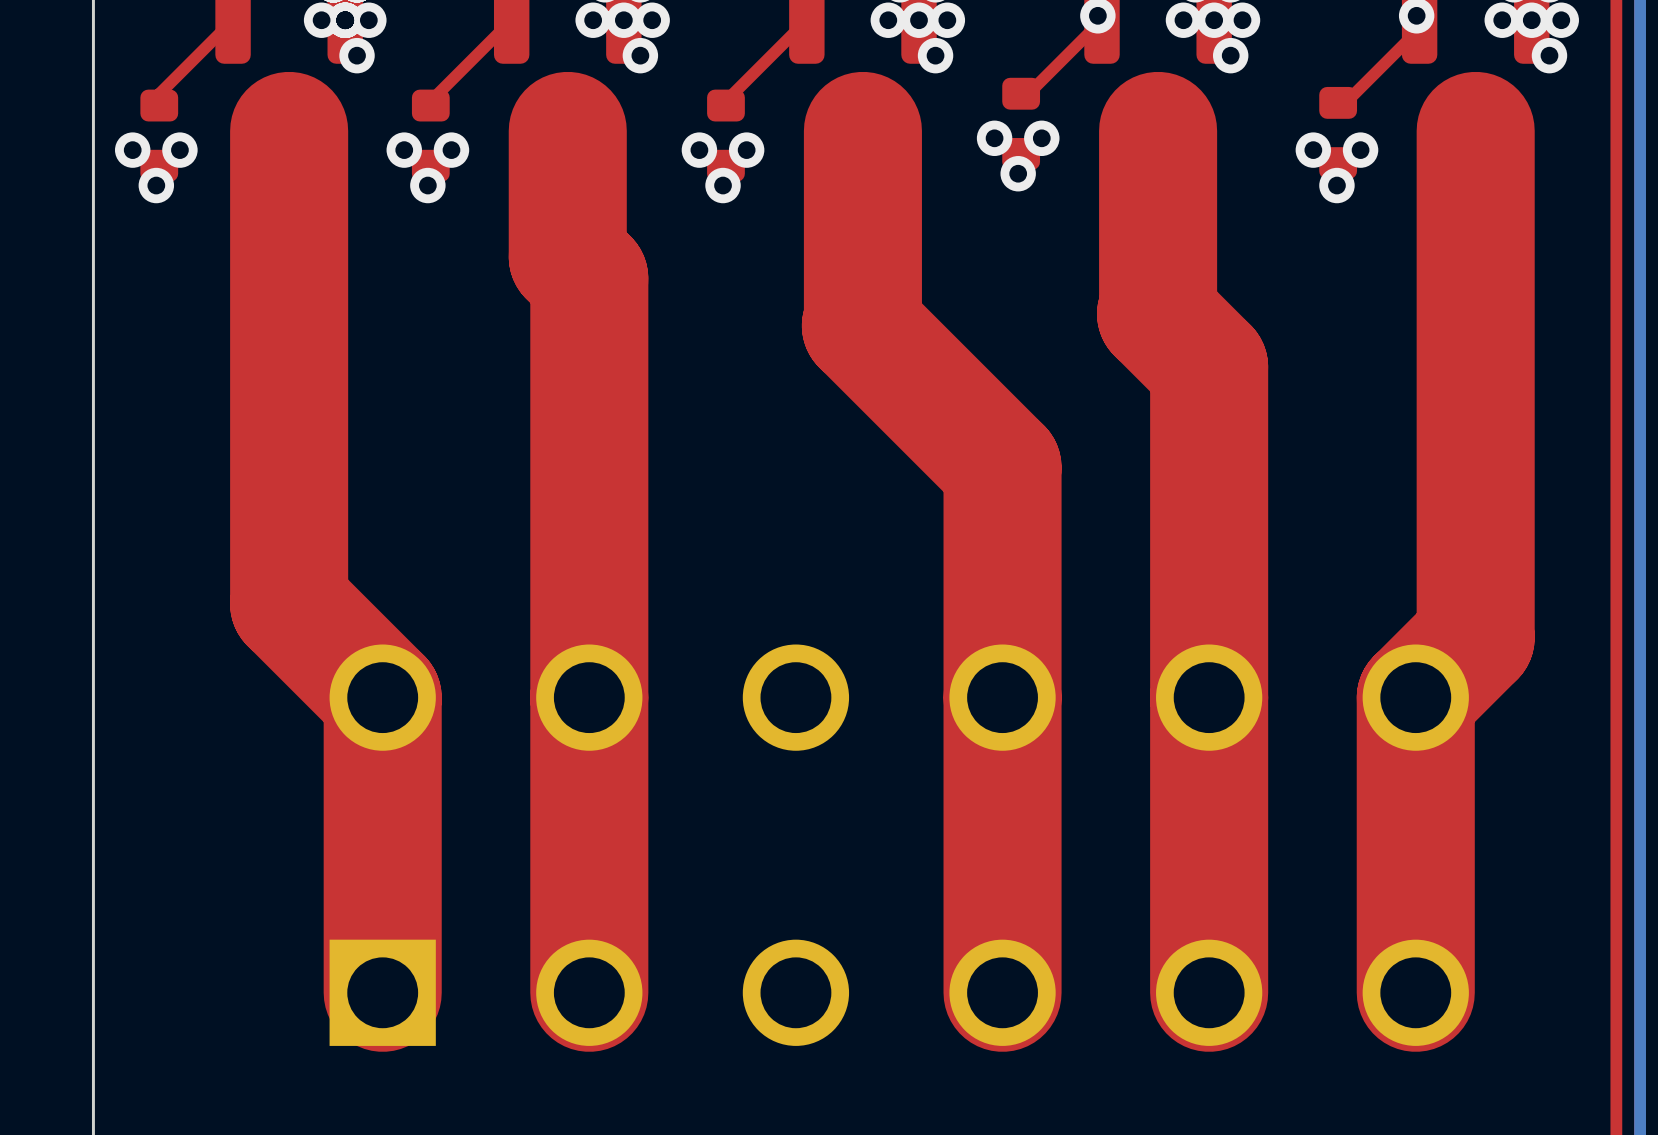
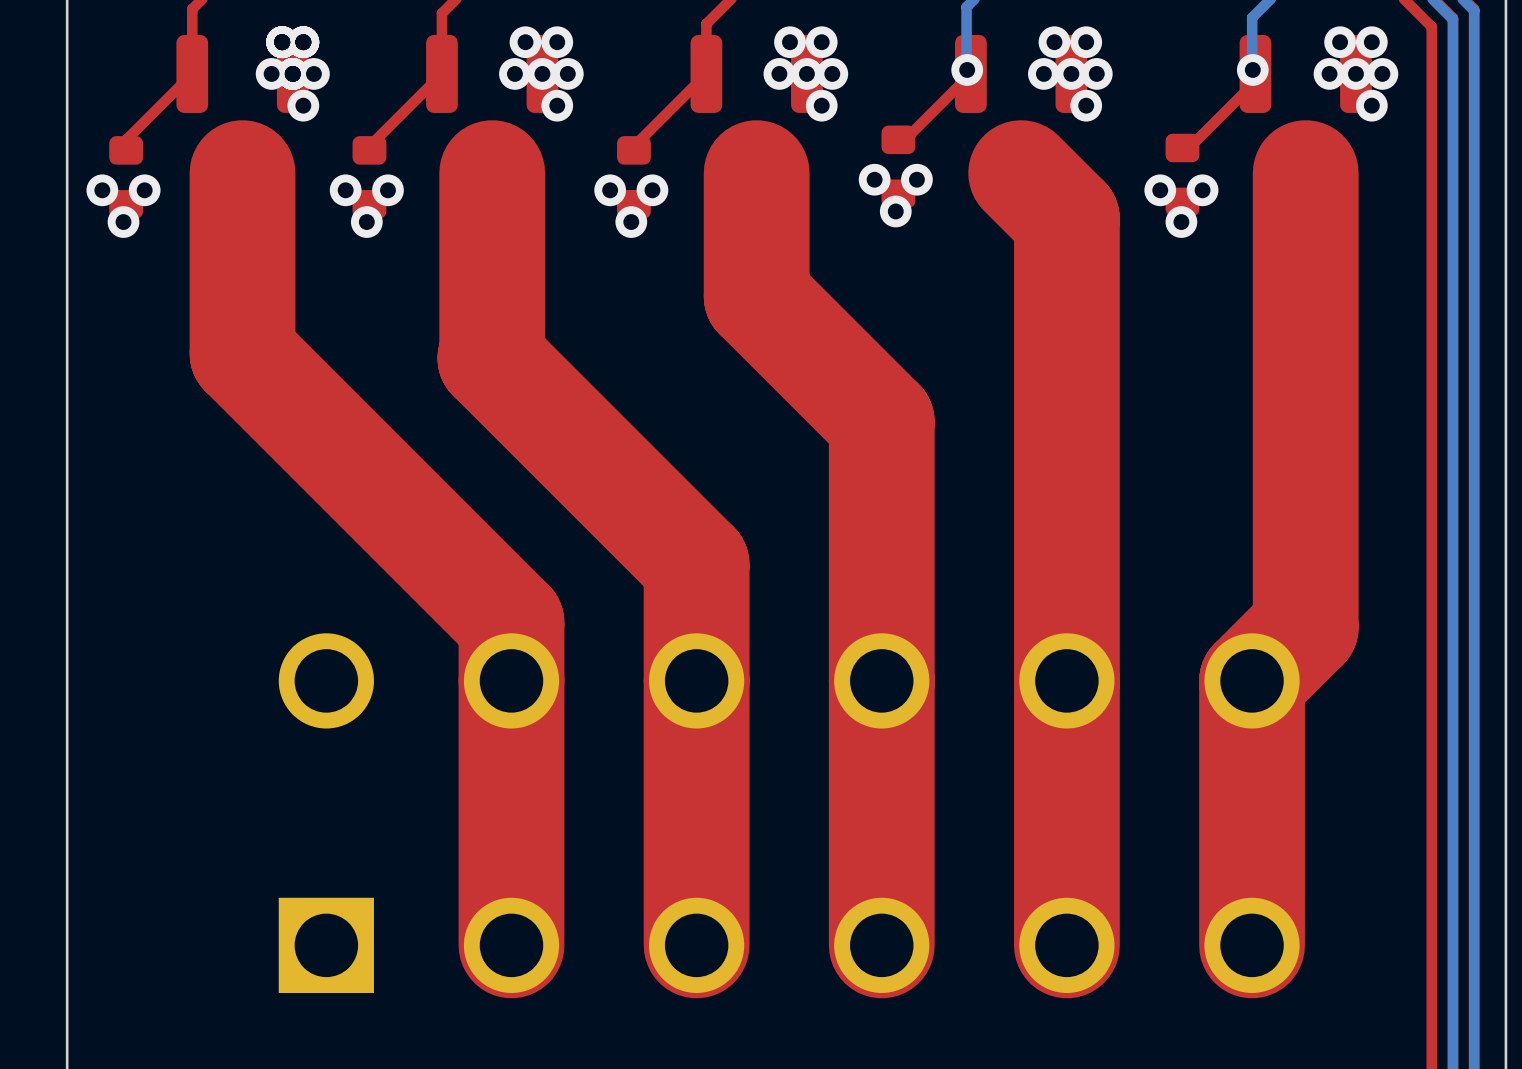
top track: (1158, 130) (1158, 311) (1156, 313) (1209, 367) -> (1021, 173) (1066, 218) (1066, 384)
top track: (567, 256) (589, 278) (589, 632) -> (242, 353) (511, 622)
top track: none -> (492, 286) (492, 356) (490, 358) (696, 564) (696, 945)
top track: (862, 268) (862, 323) (860, 325) (1002, 467) -> (756, 296) (881, 421) (881, 474)
top track: (289, 332) (289, 604) (382, 697) (382, 992) -> none

